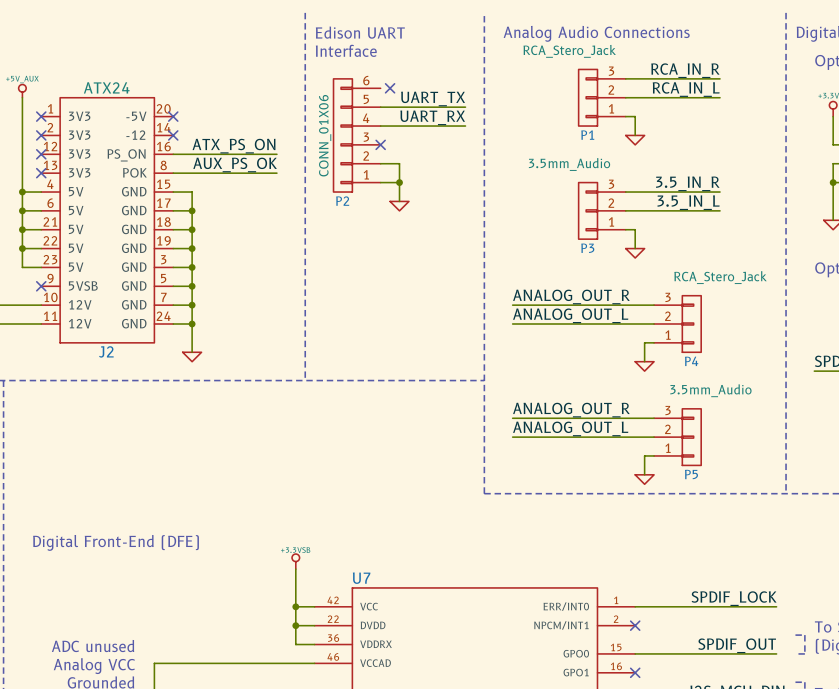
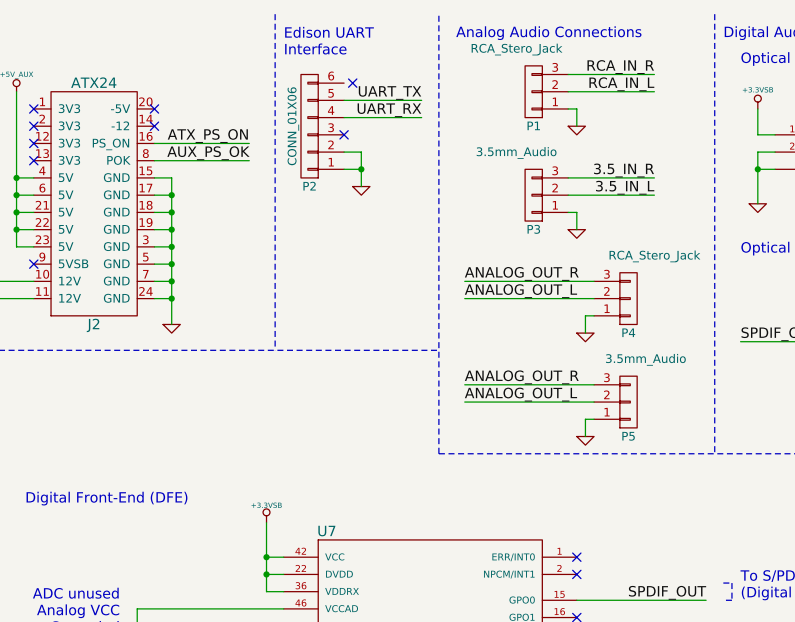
label: SPDIF_LOCK (734, 598) -> none
wire: (635, 606) (776, 606) -> none
no-connect mark: none -> (576, 557)

